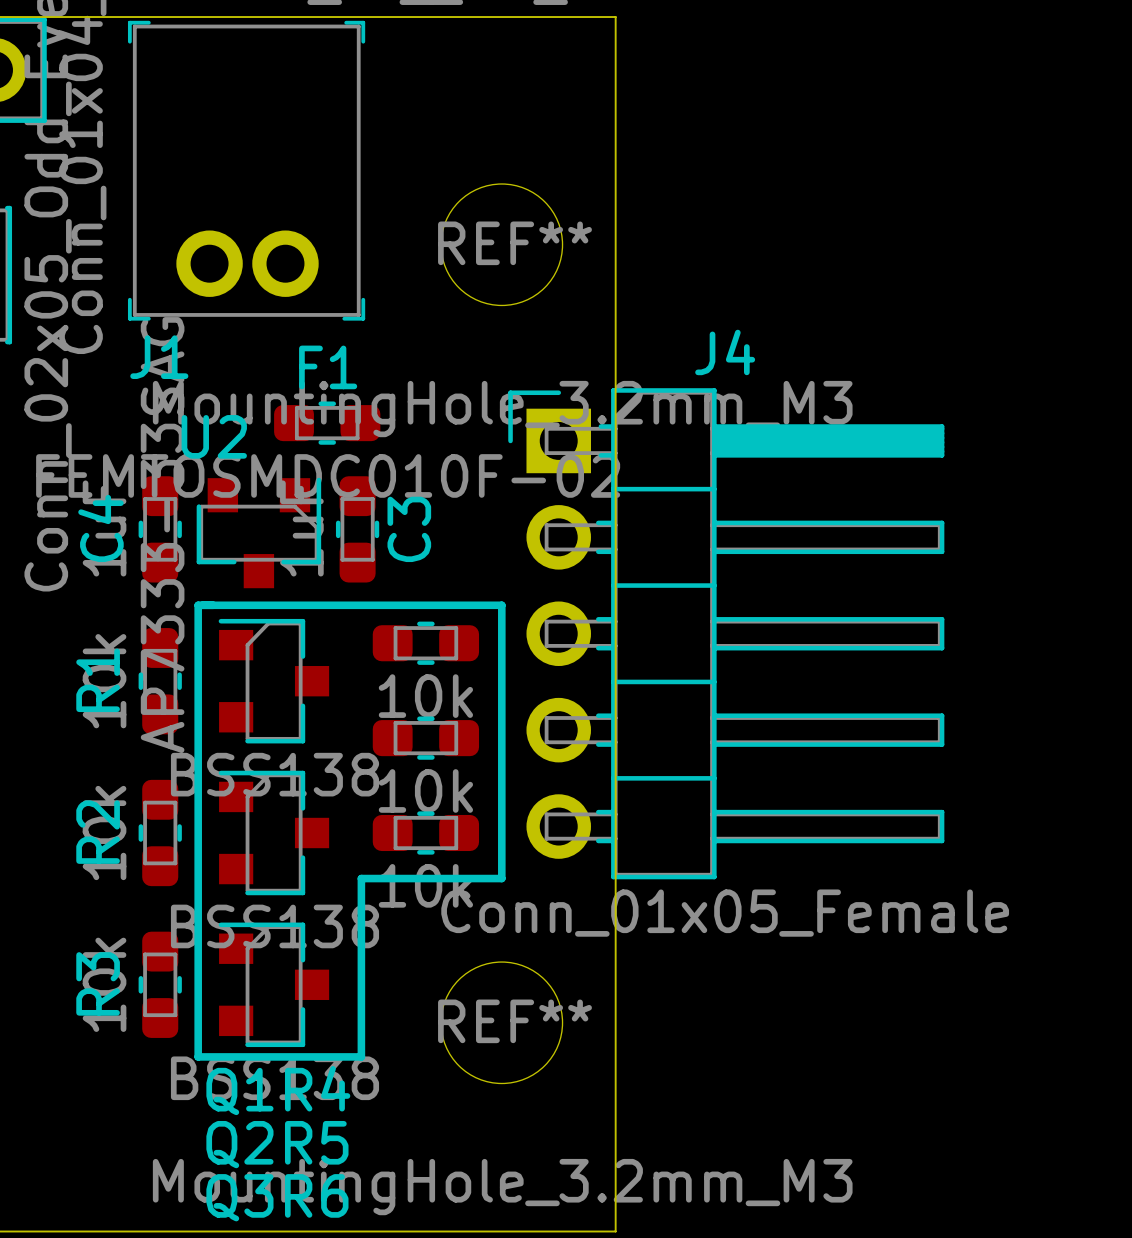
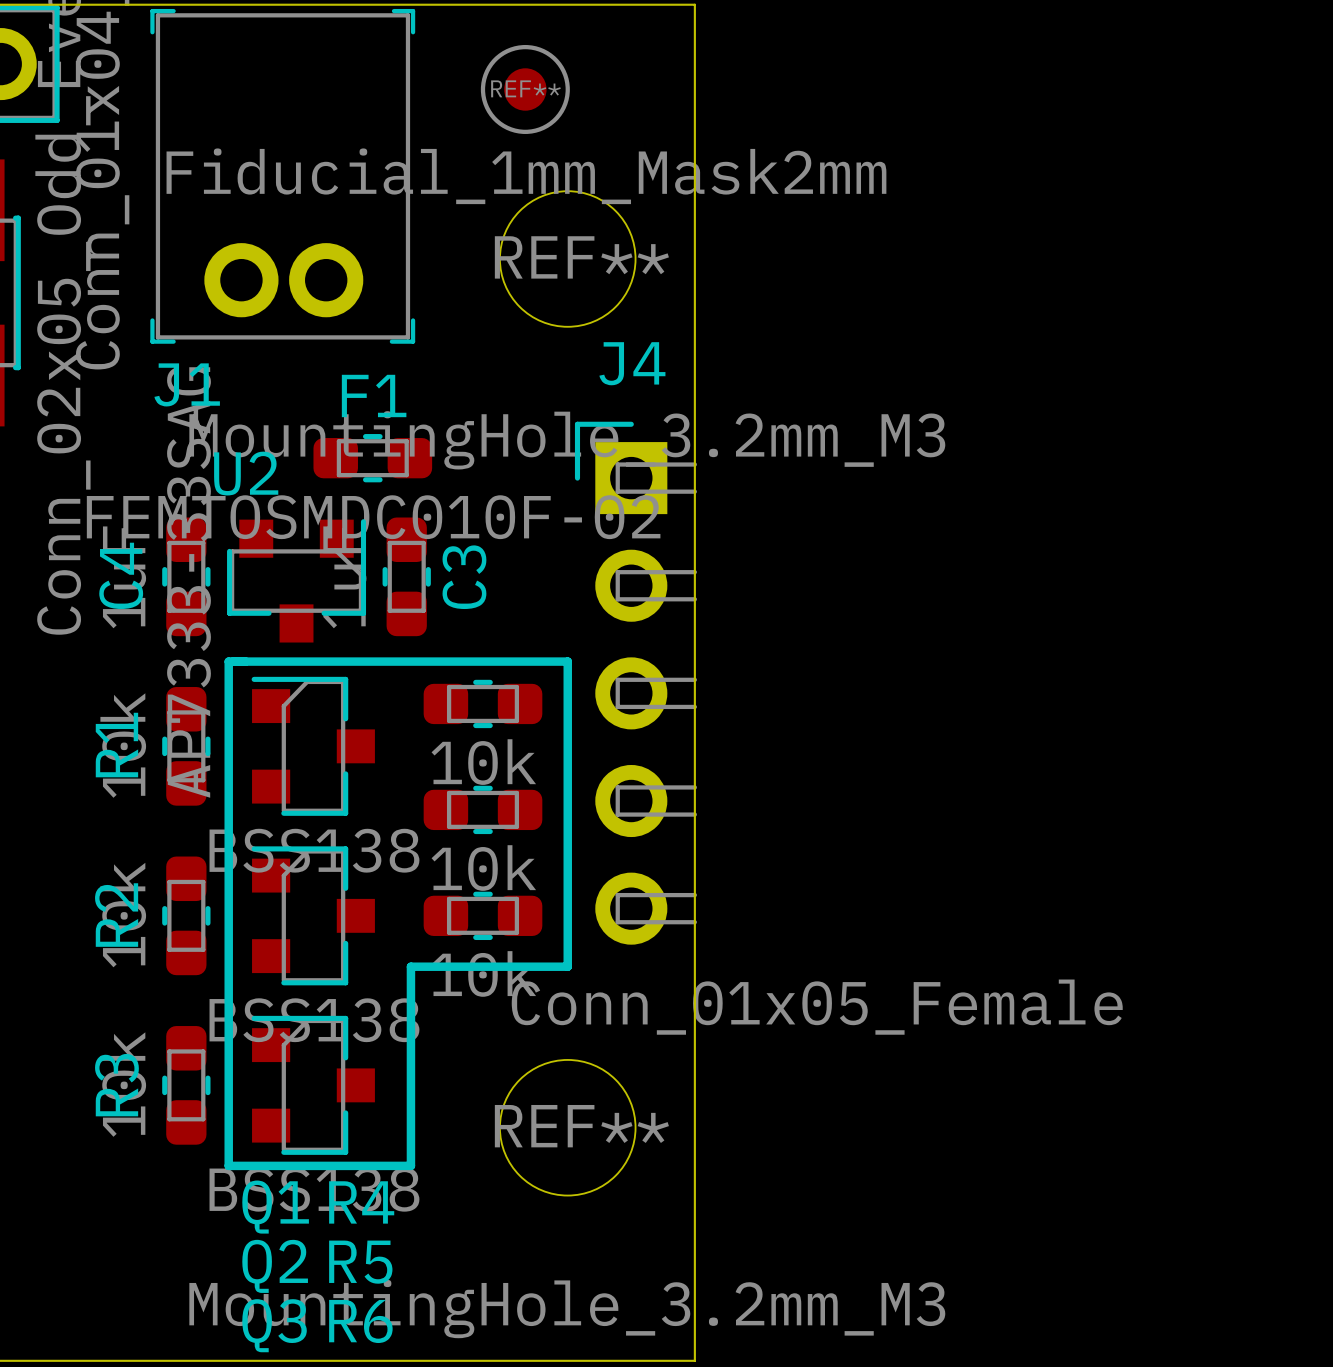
REF**: none -> Fiducial_1mm_Mask2mm (525, 89)
J4 footprint: [508, 388, 945, 880] -> [574, 421, 698, 945]

